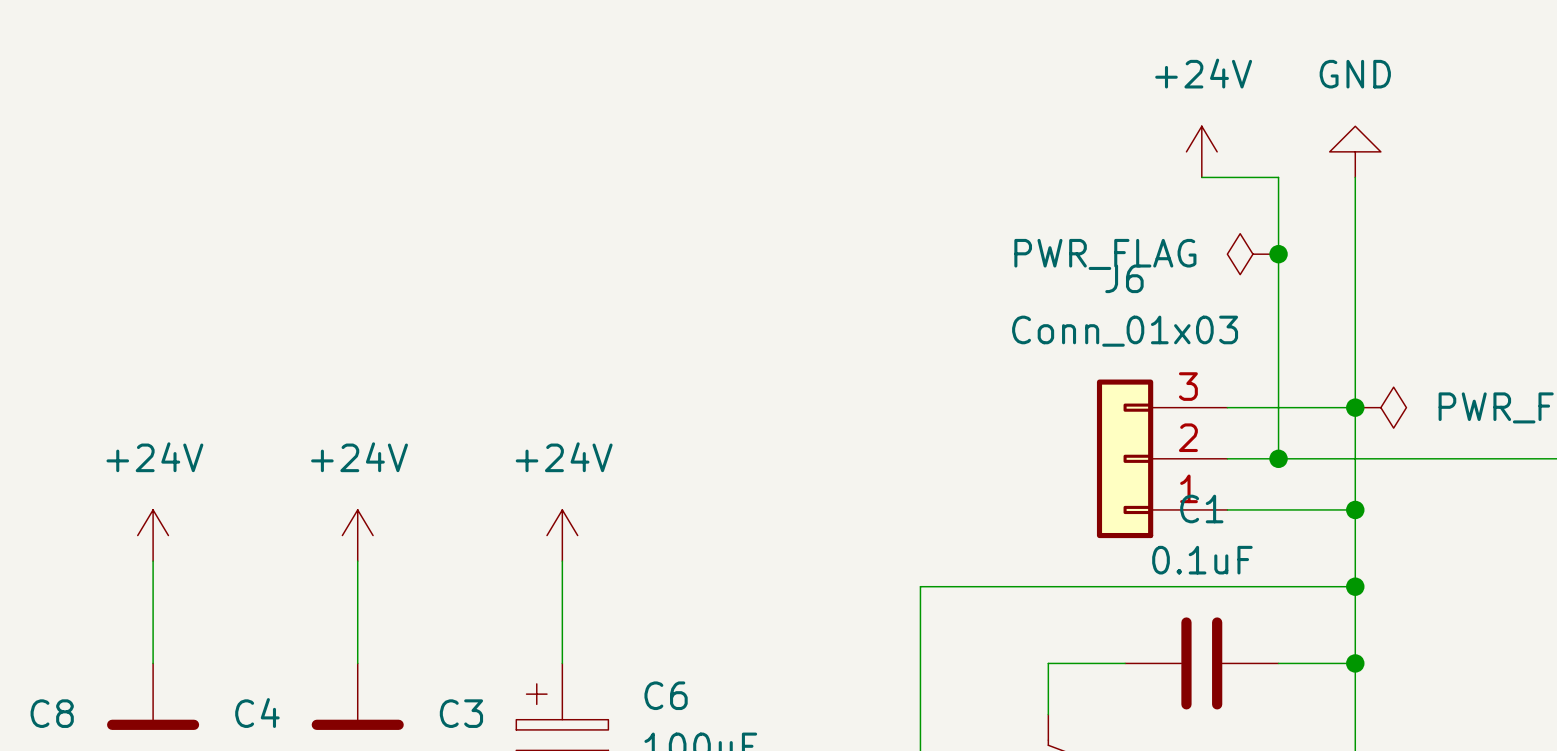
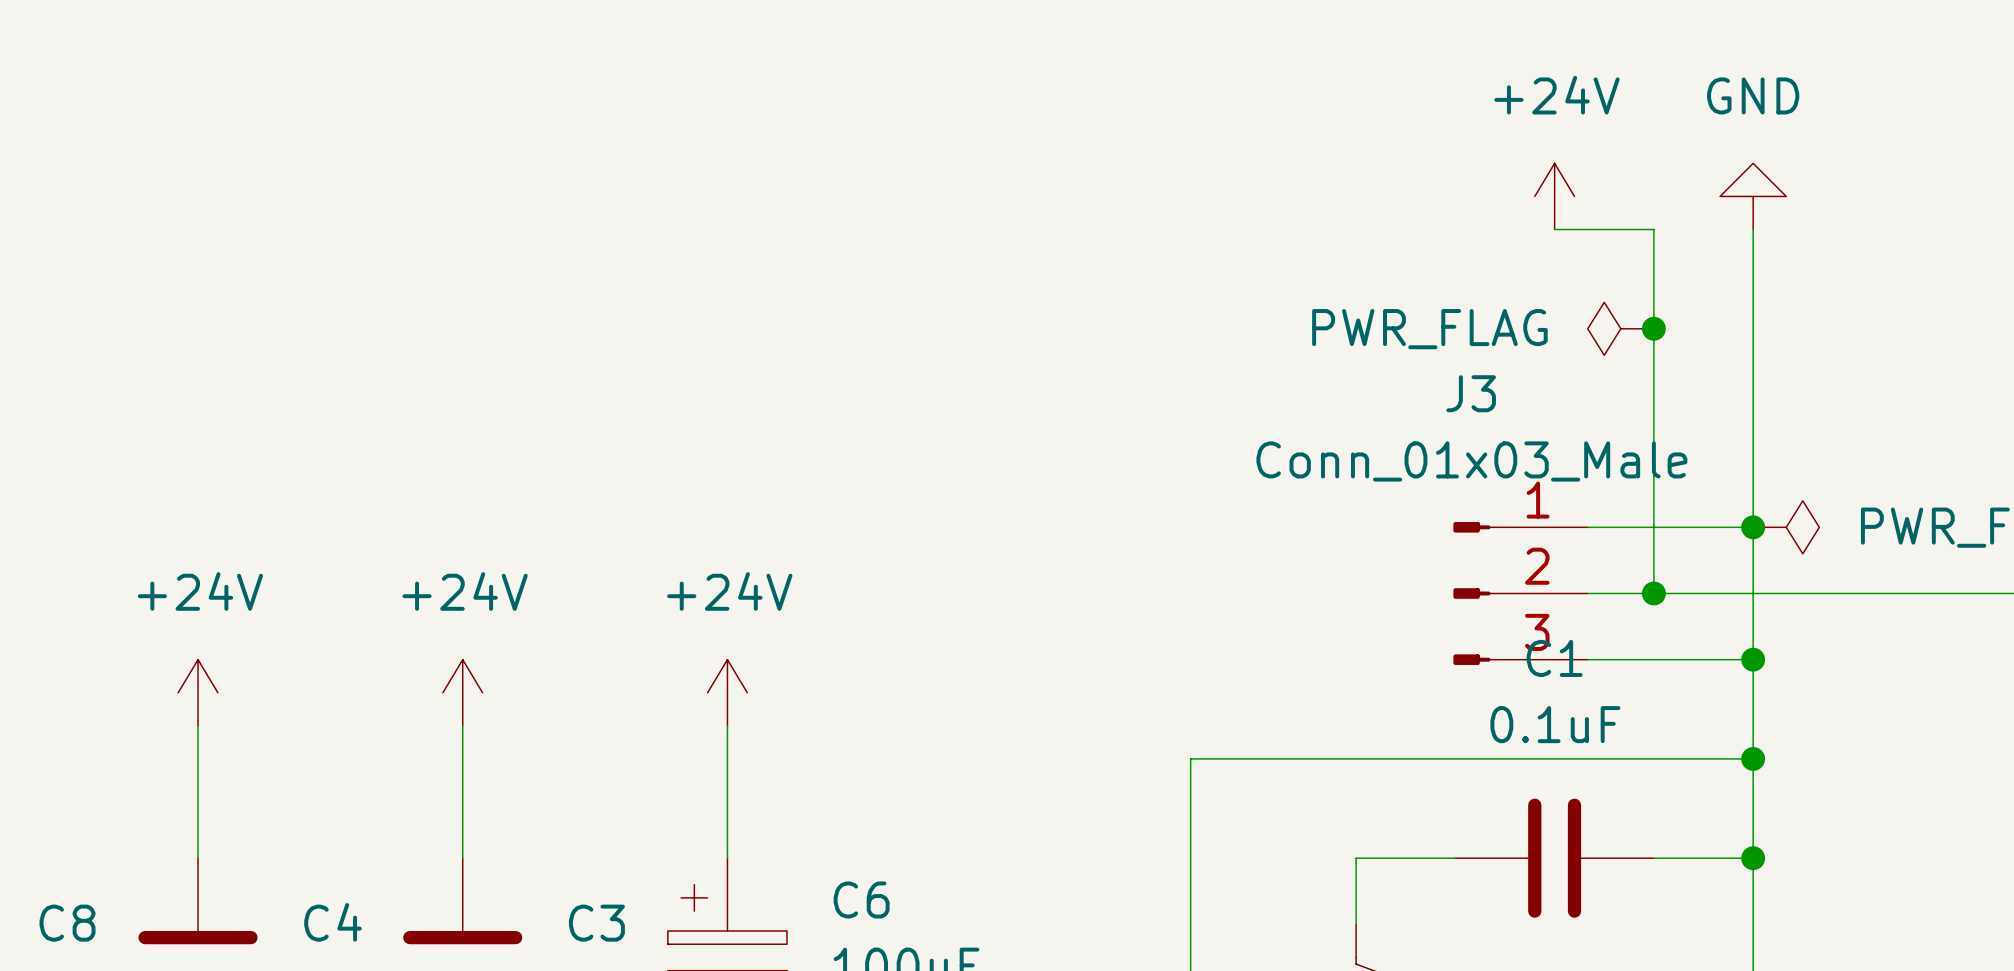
J6: Conn_01x03 (1162, 458) -> none
J3: none -> Conn_01x03_Male (1520, 593)

